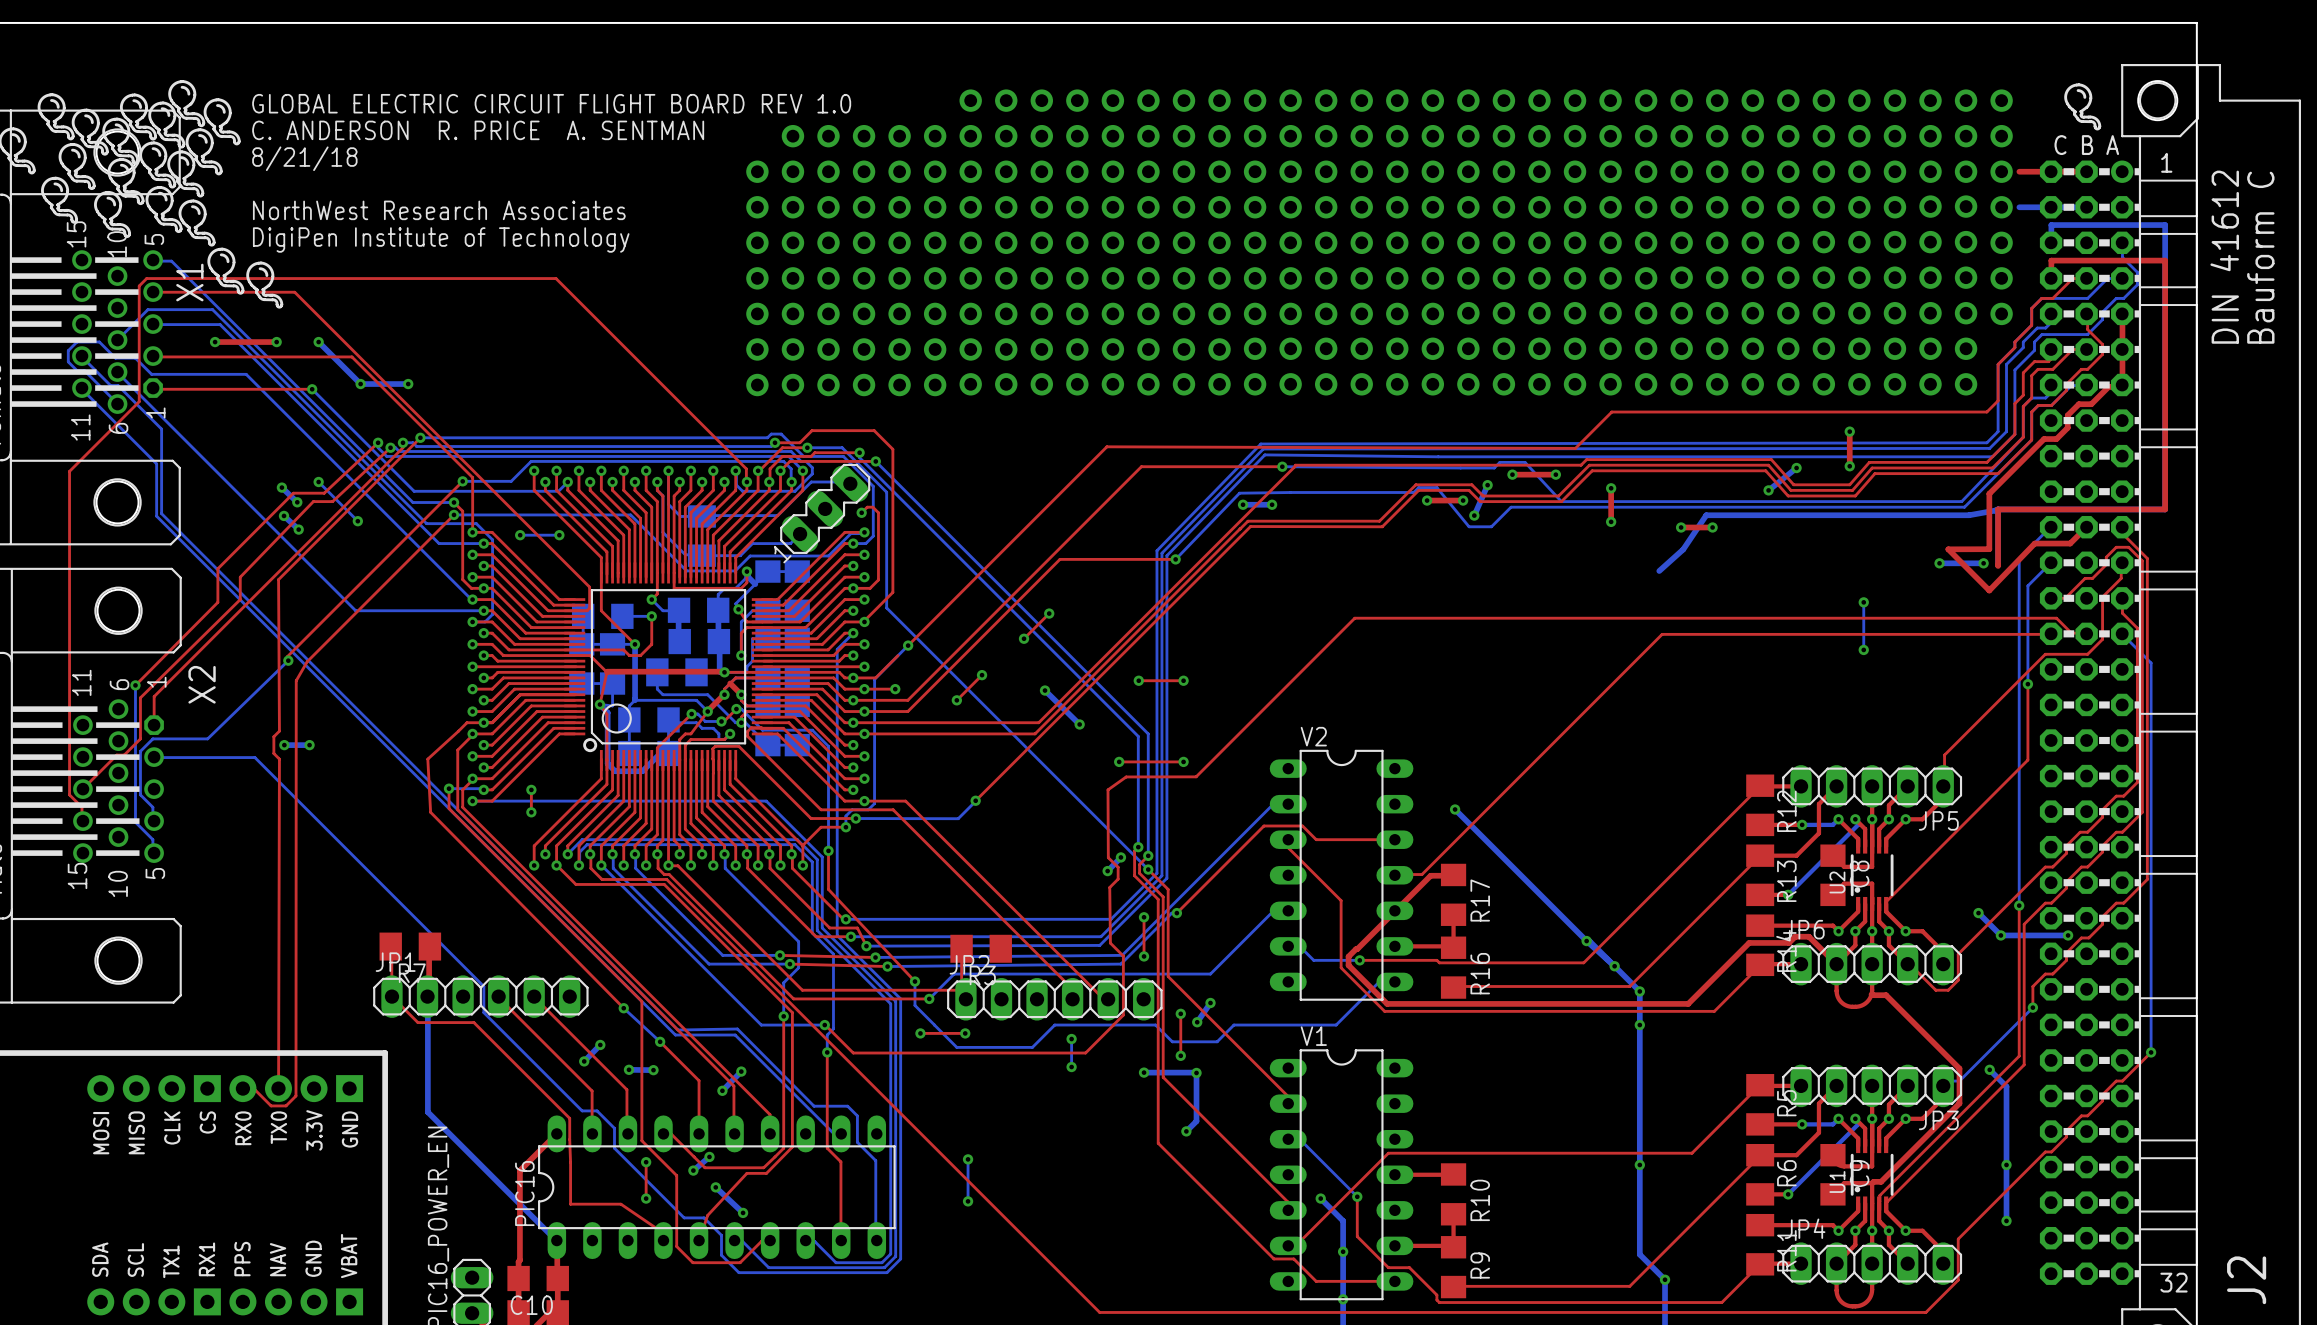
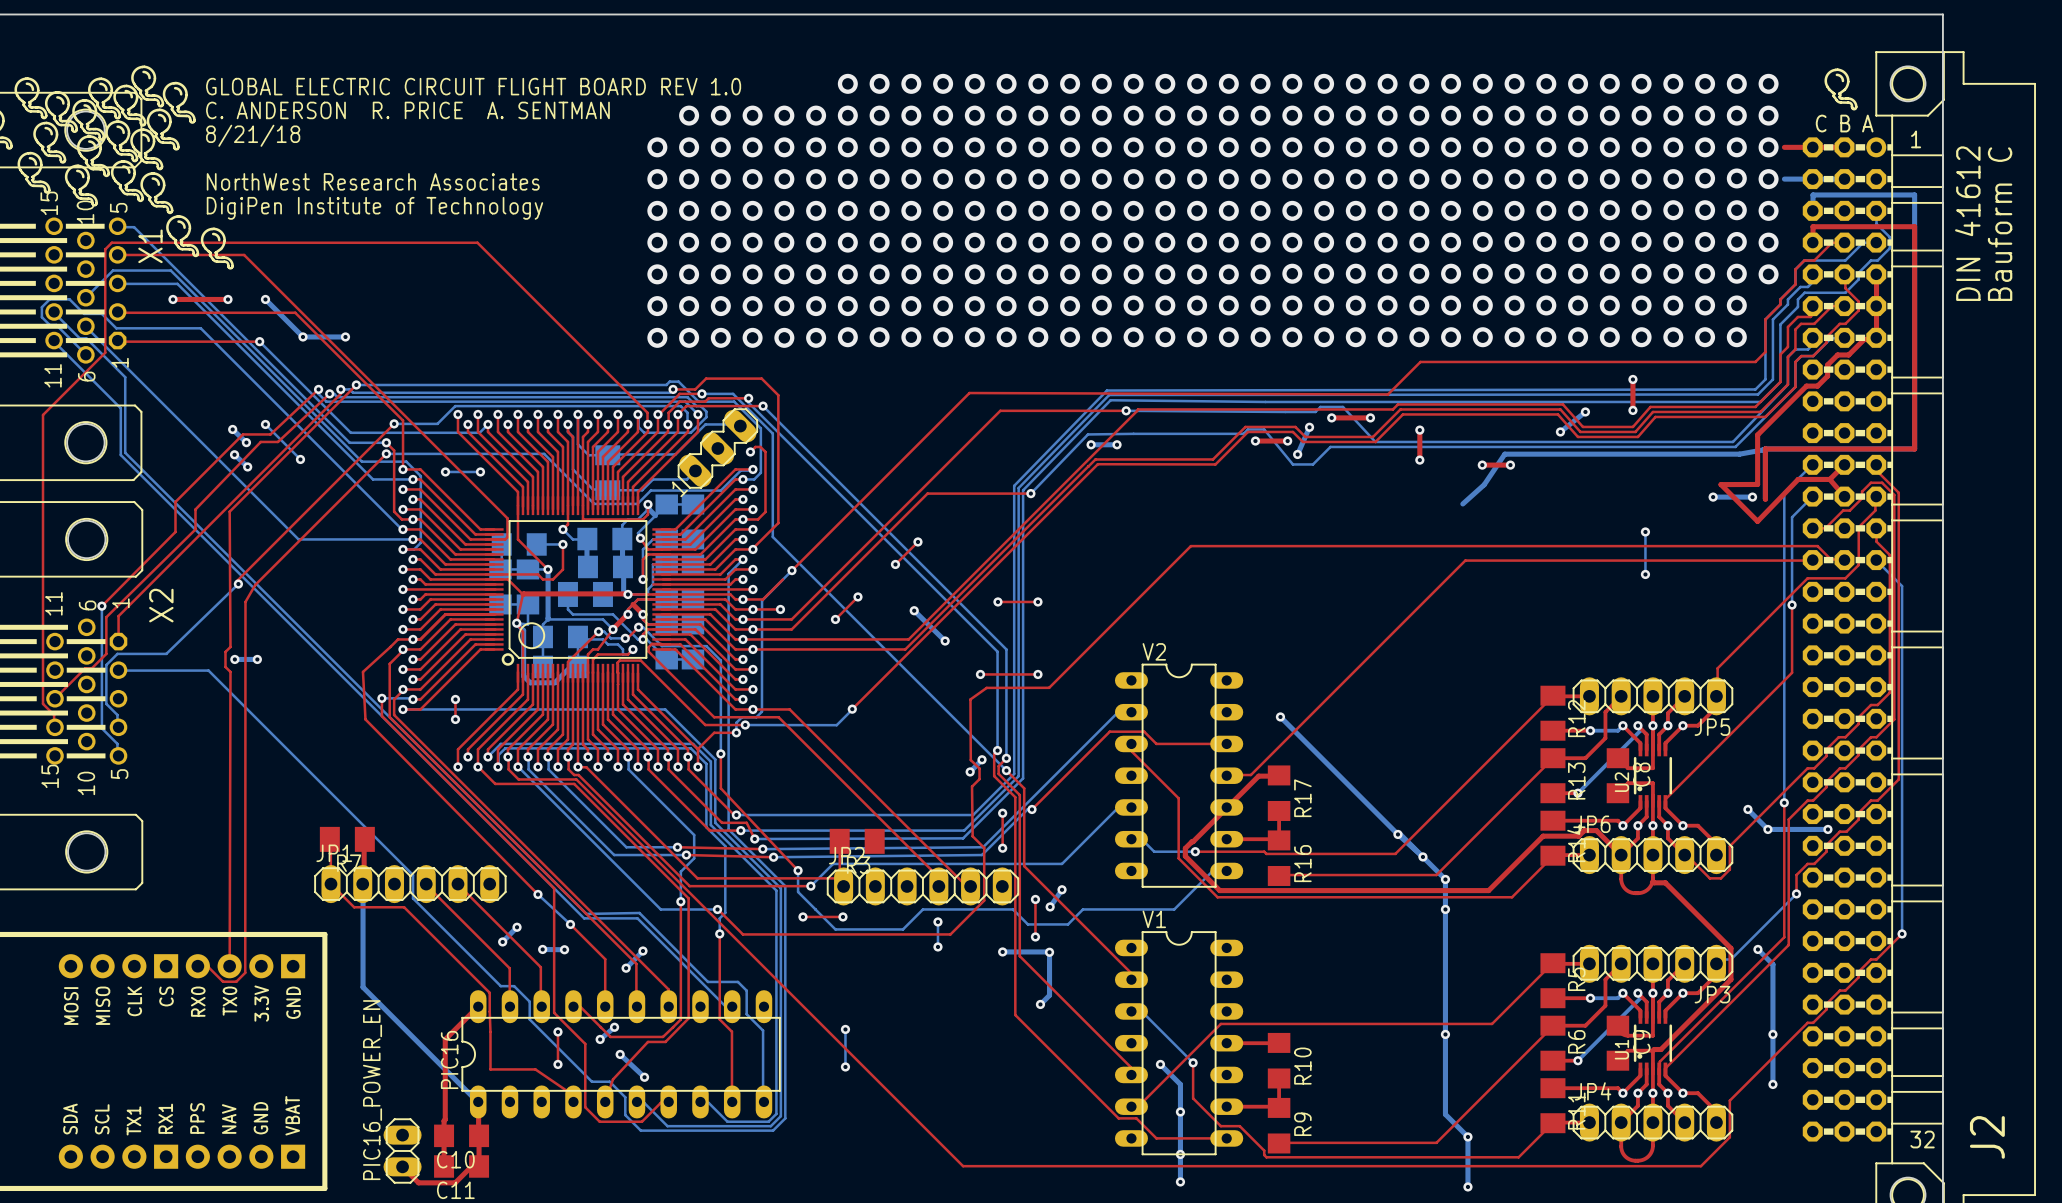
top track: none -> (1829, 479) (1844, 496)

